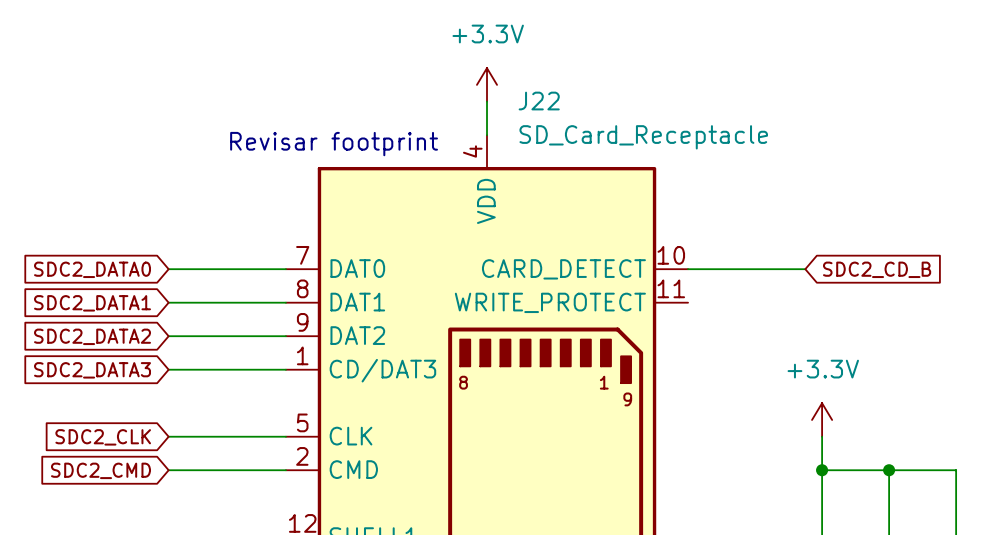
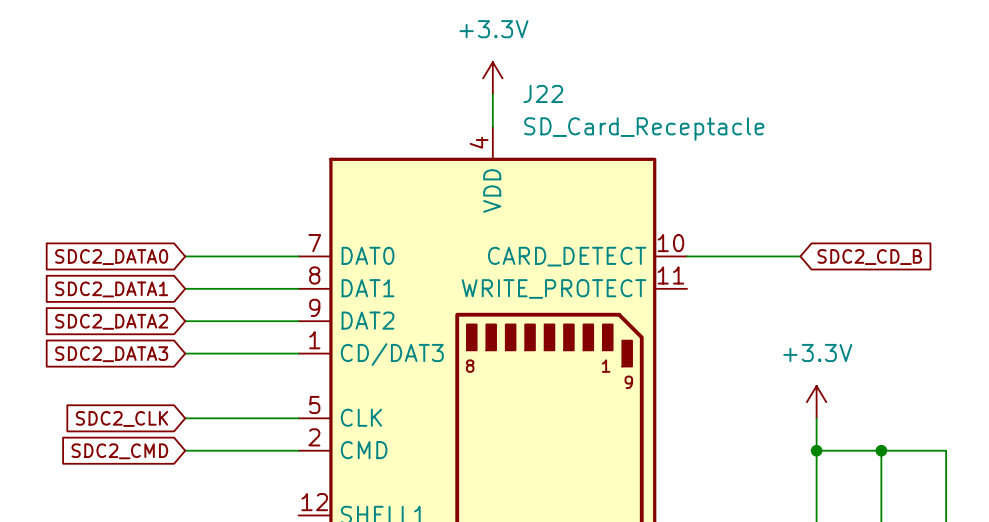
text: Revisar footprint (334, 144) -> none

